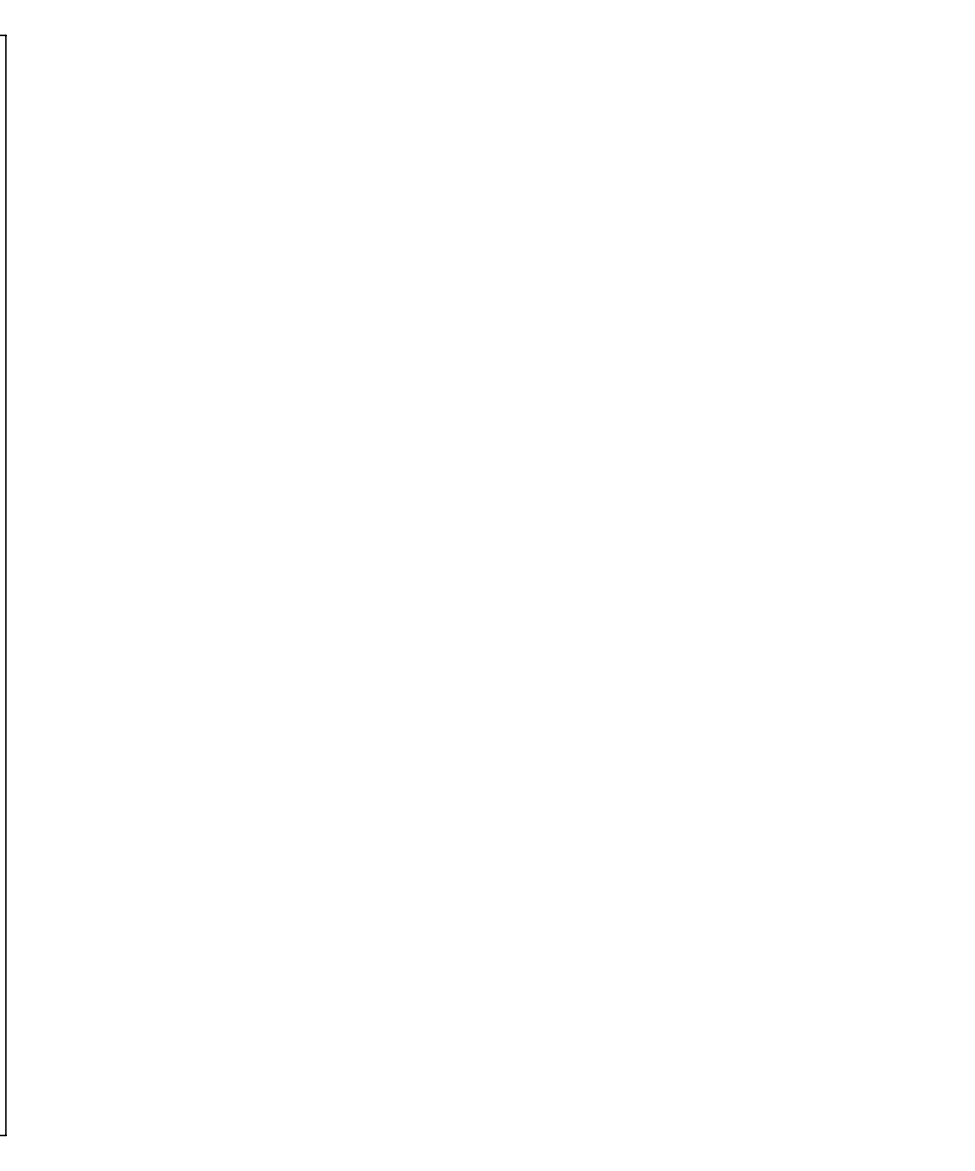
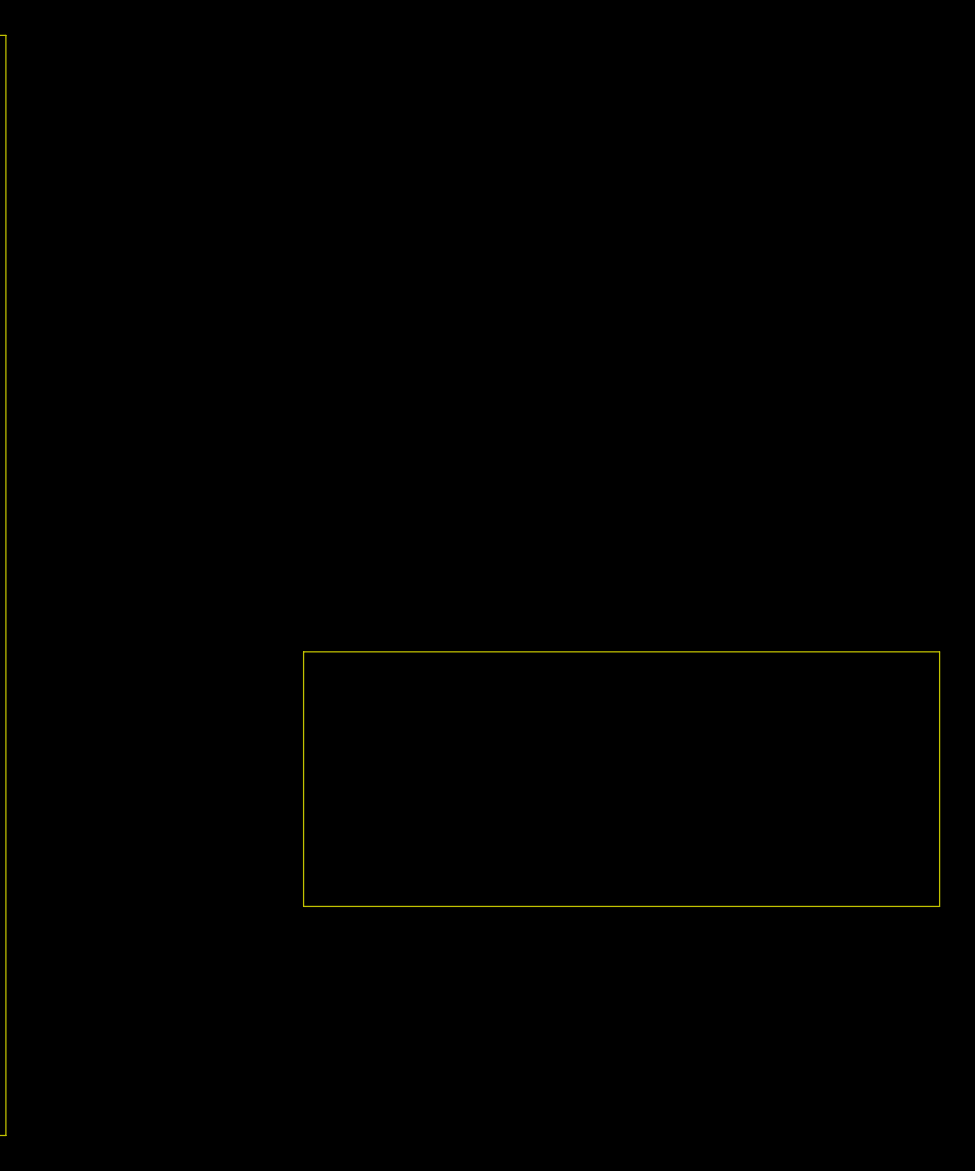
board edge: none -> (939, 651) (939, 906) (303, 906) (303, 651) (939, 651)

